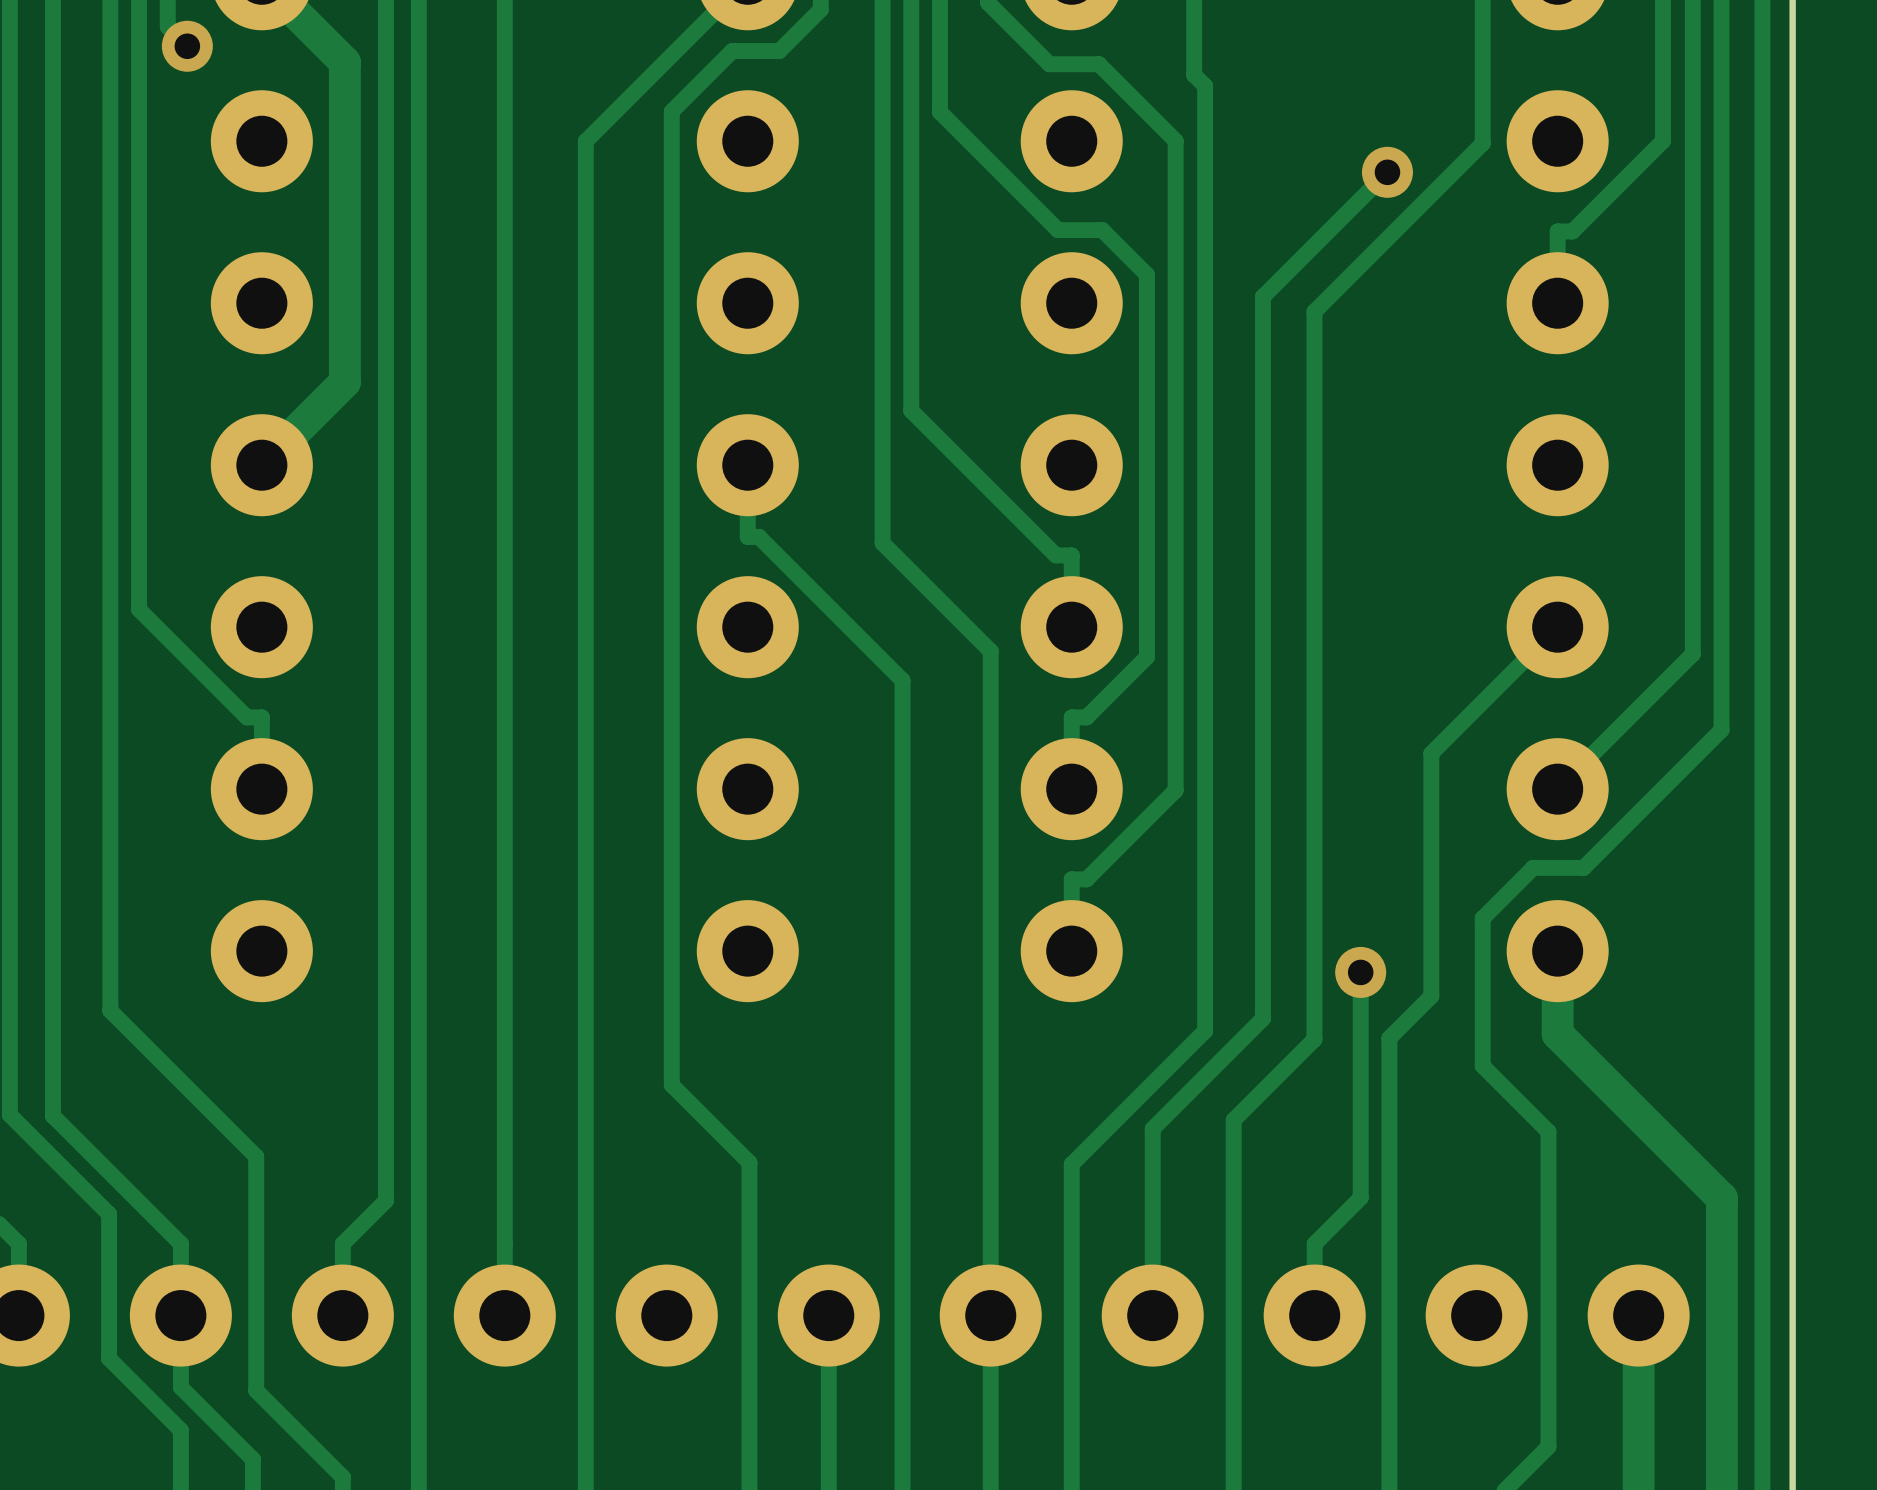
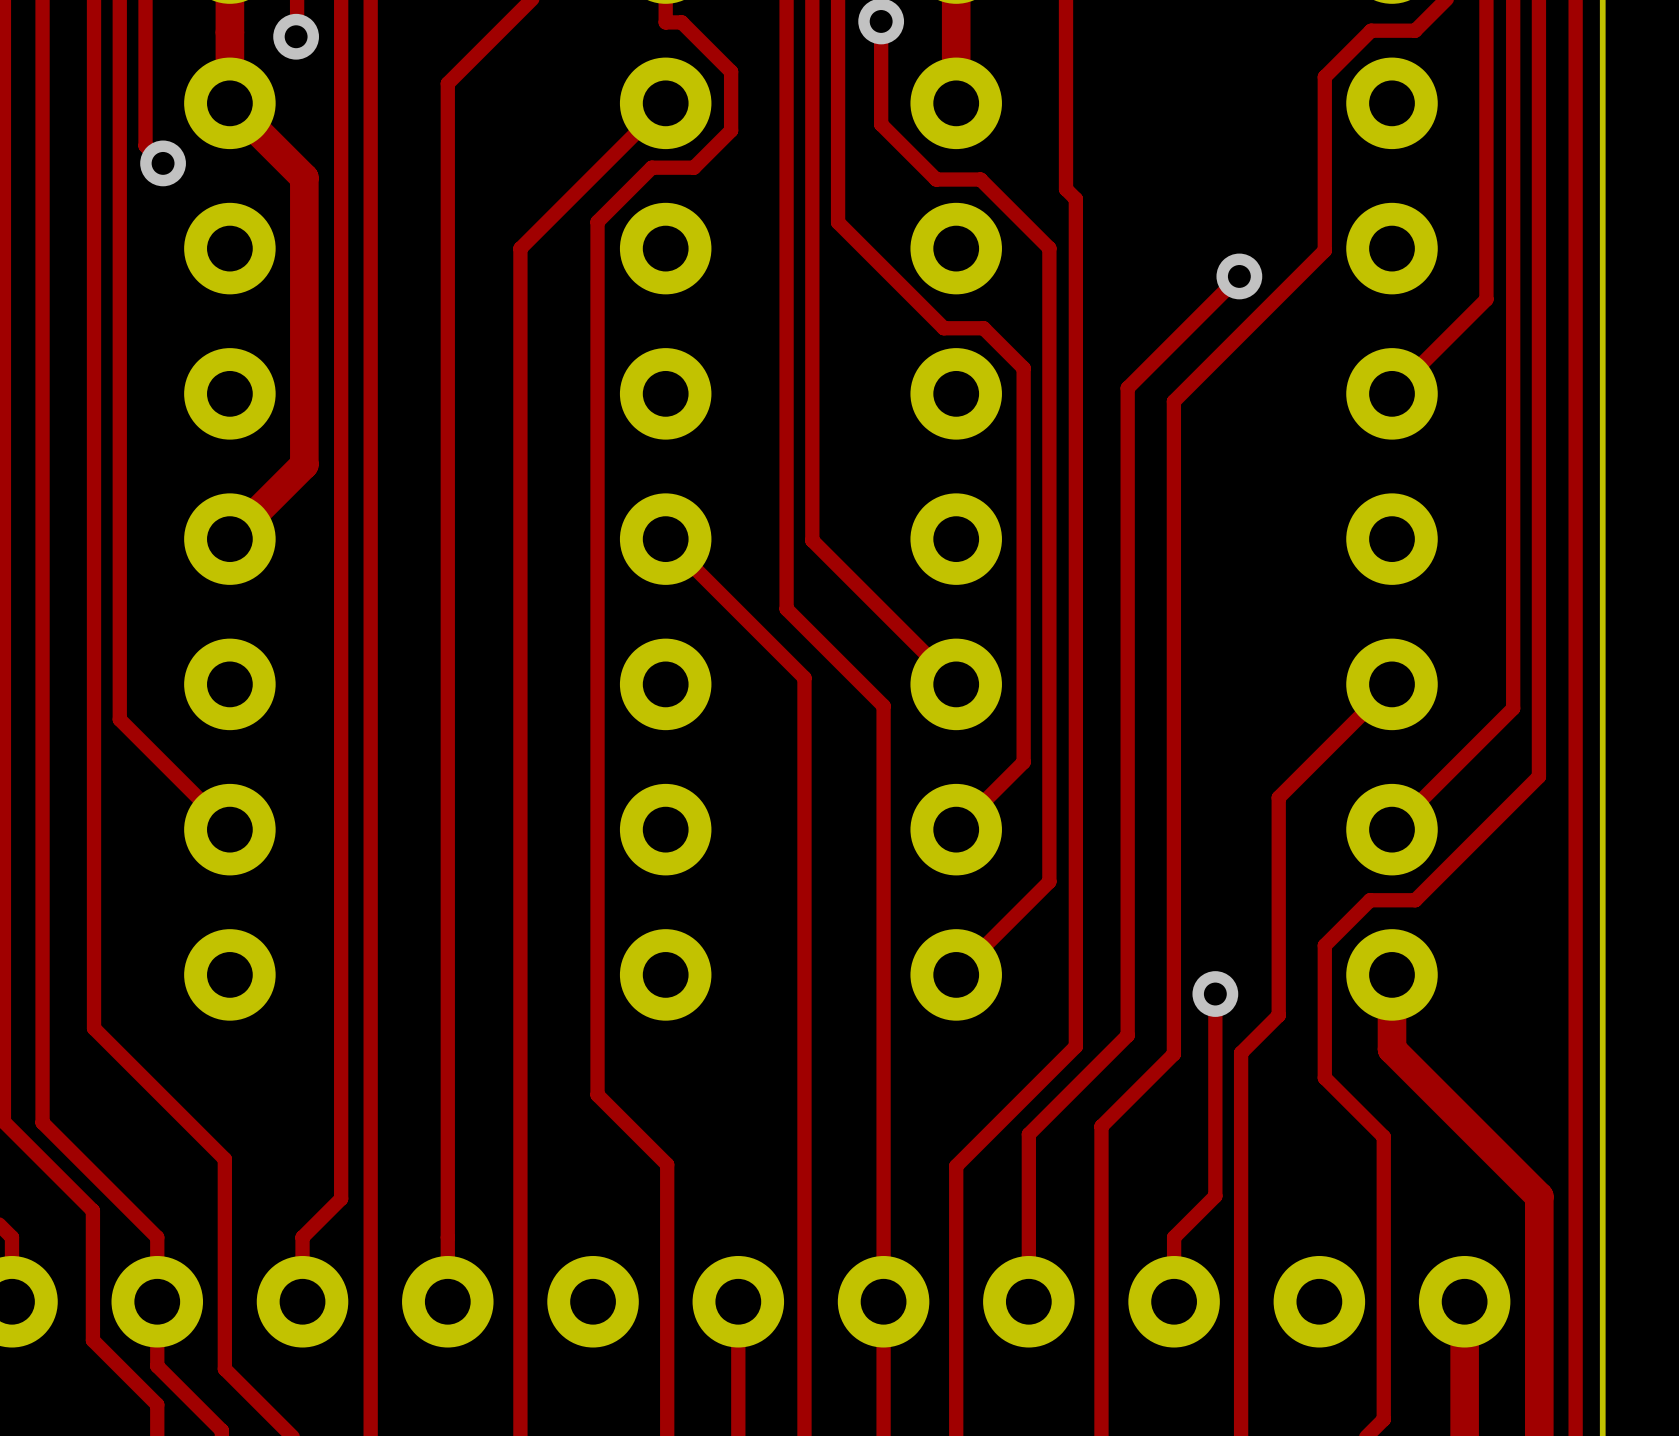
track: (1662, 141) (1572, 231) (1557, 231) (1557, 303) -> (1486, 248) (1486, 299) (1392, 393)
track: (911, 410) (1055, 555) (1071, 555) (1071, 627) -> (812, 490) (812, 540) (956, 684)
track: (747, 465) (747, 536) (759, 536) (902, 680) -> (665, 539) (804, 677) (804, 732)
track: (139, 609) (246, 717) (261, 717) (261, 789) -> (119, 668) (119, 719) (229, 829)
track: (1146, 657) (1086, 717) (1071, 717) (1071, 789) -> (1023, 711) (1023, 762) (956, 829)
track: (1175, 790) (1086, 879) (1071, 879) (1071, 951) -> (1049, 830) (1049, 881) (956, 974)

